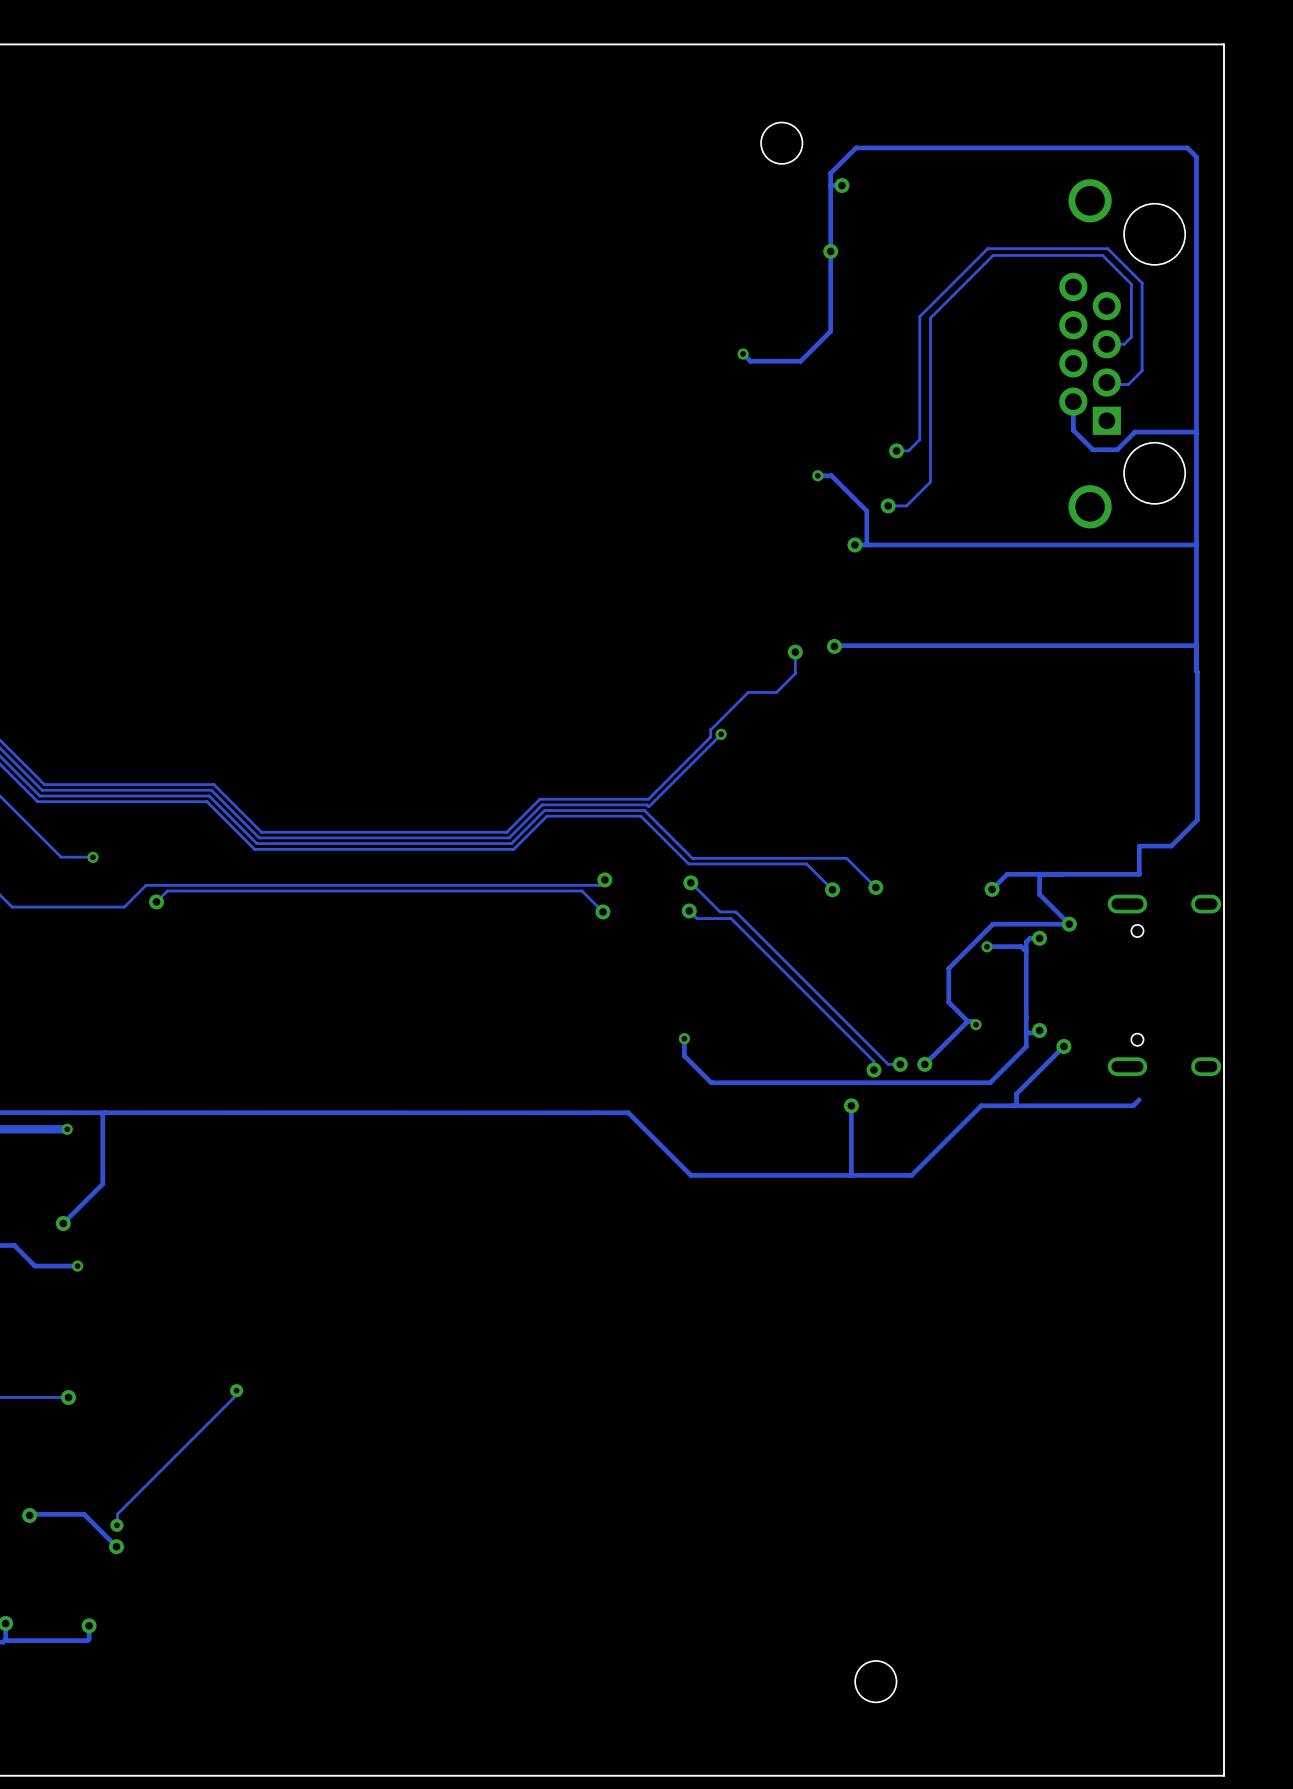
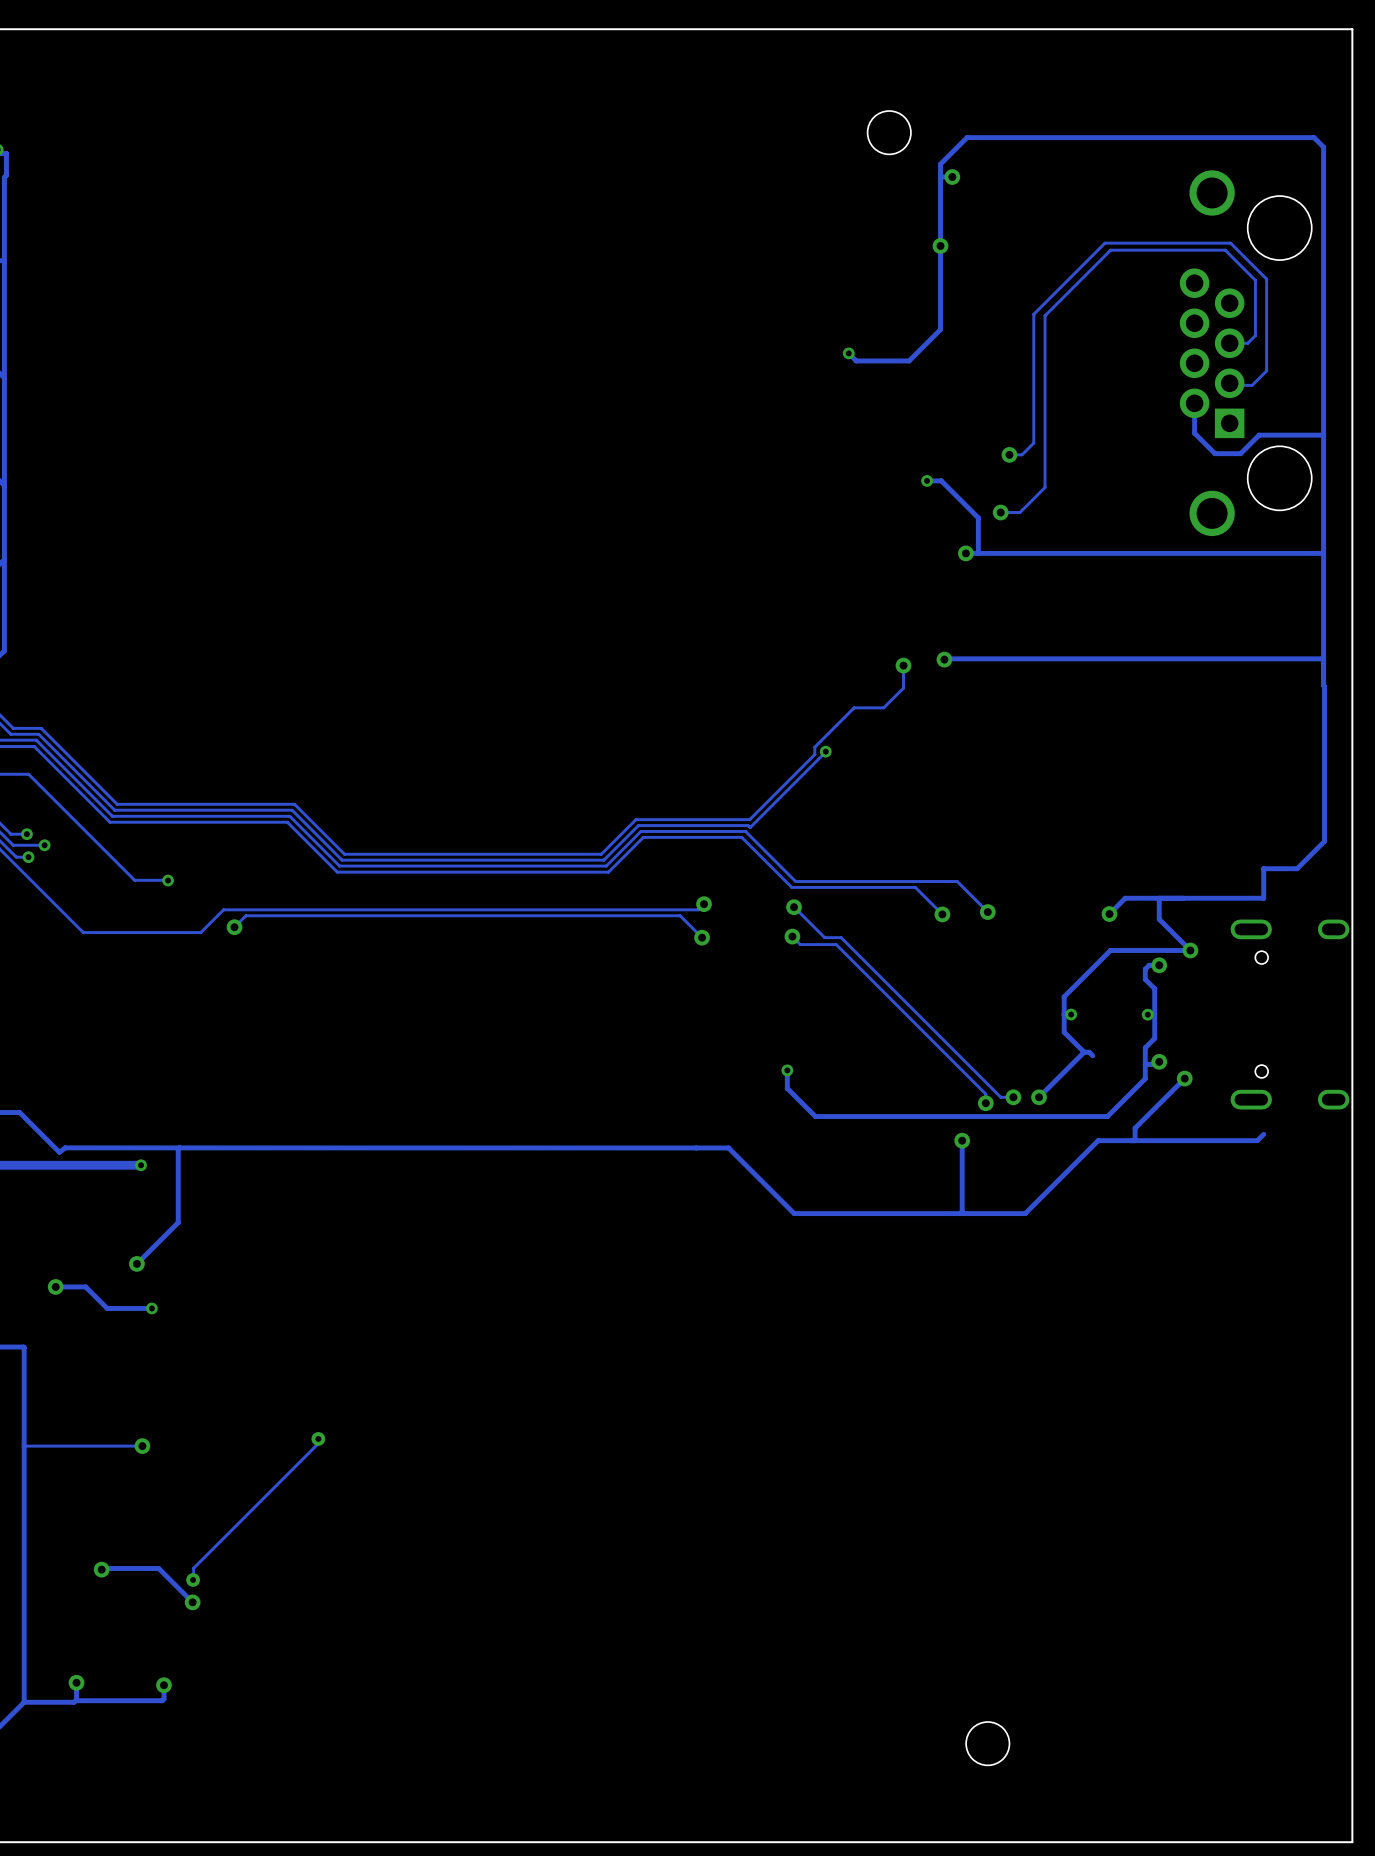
track: (987, 946) (1021, 946) (1026, 951) (1026, 1017) -> (1145, 979) (1154, 988) (1154, 1038) (1145, 1047)
via: (987, 946) -> none
via: none -> (1071, 1014)
via: none -> (1147, 1014)
via: (976, 1024) -> none

